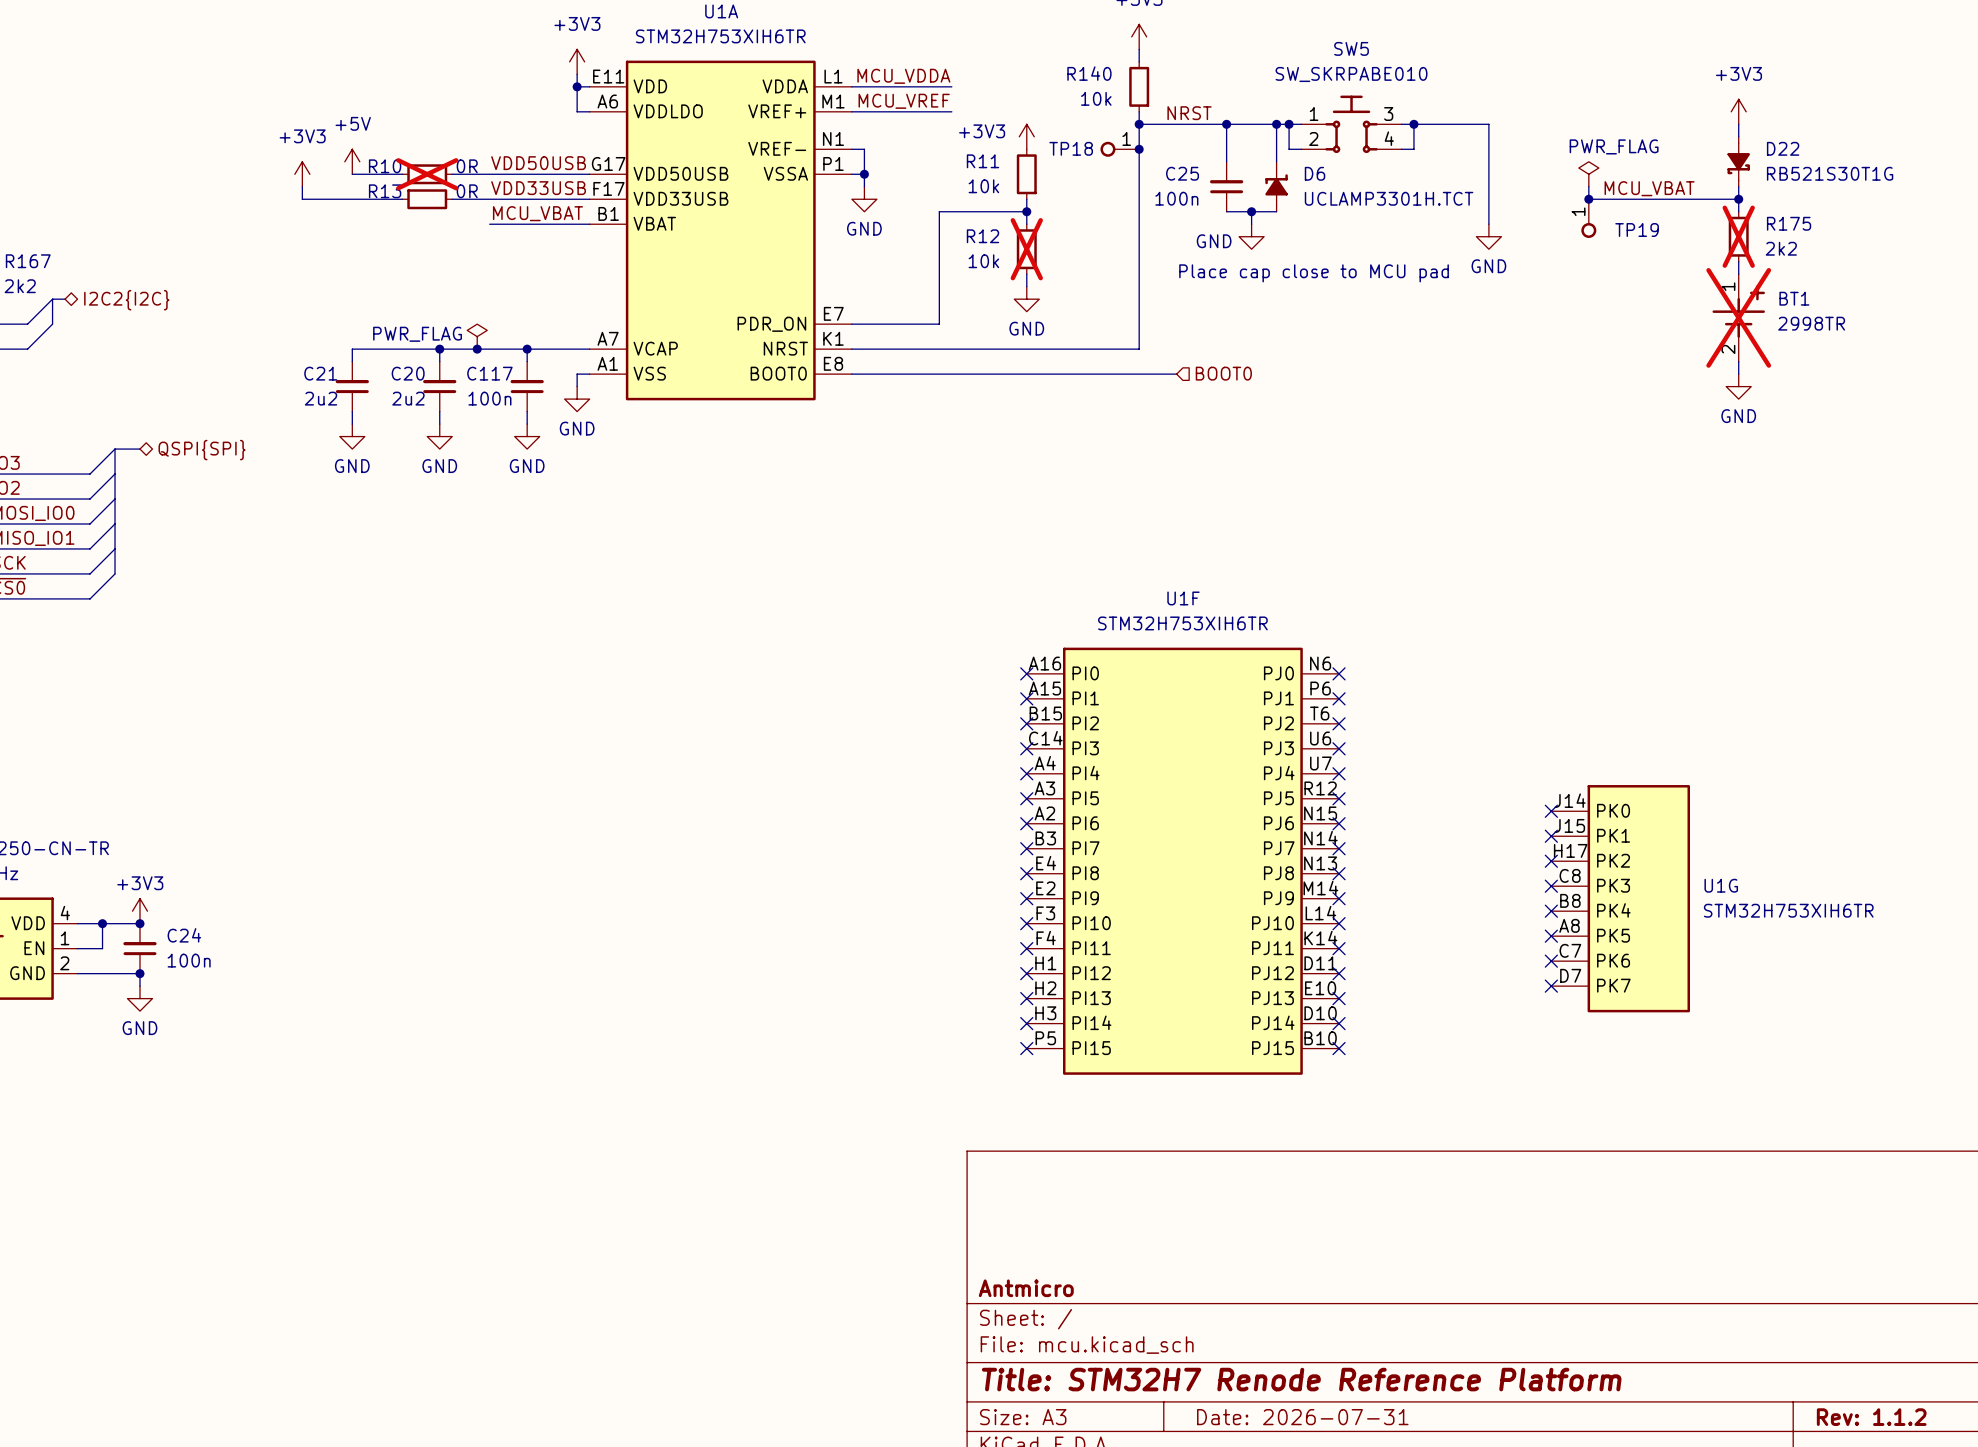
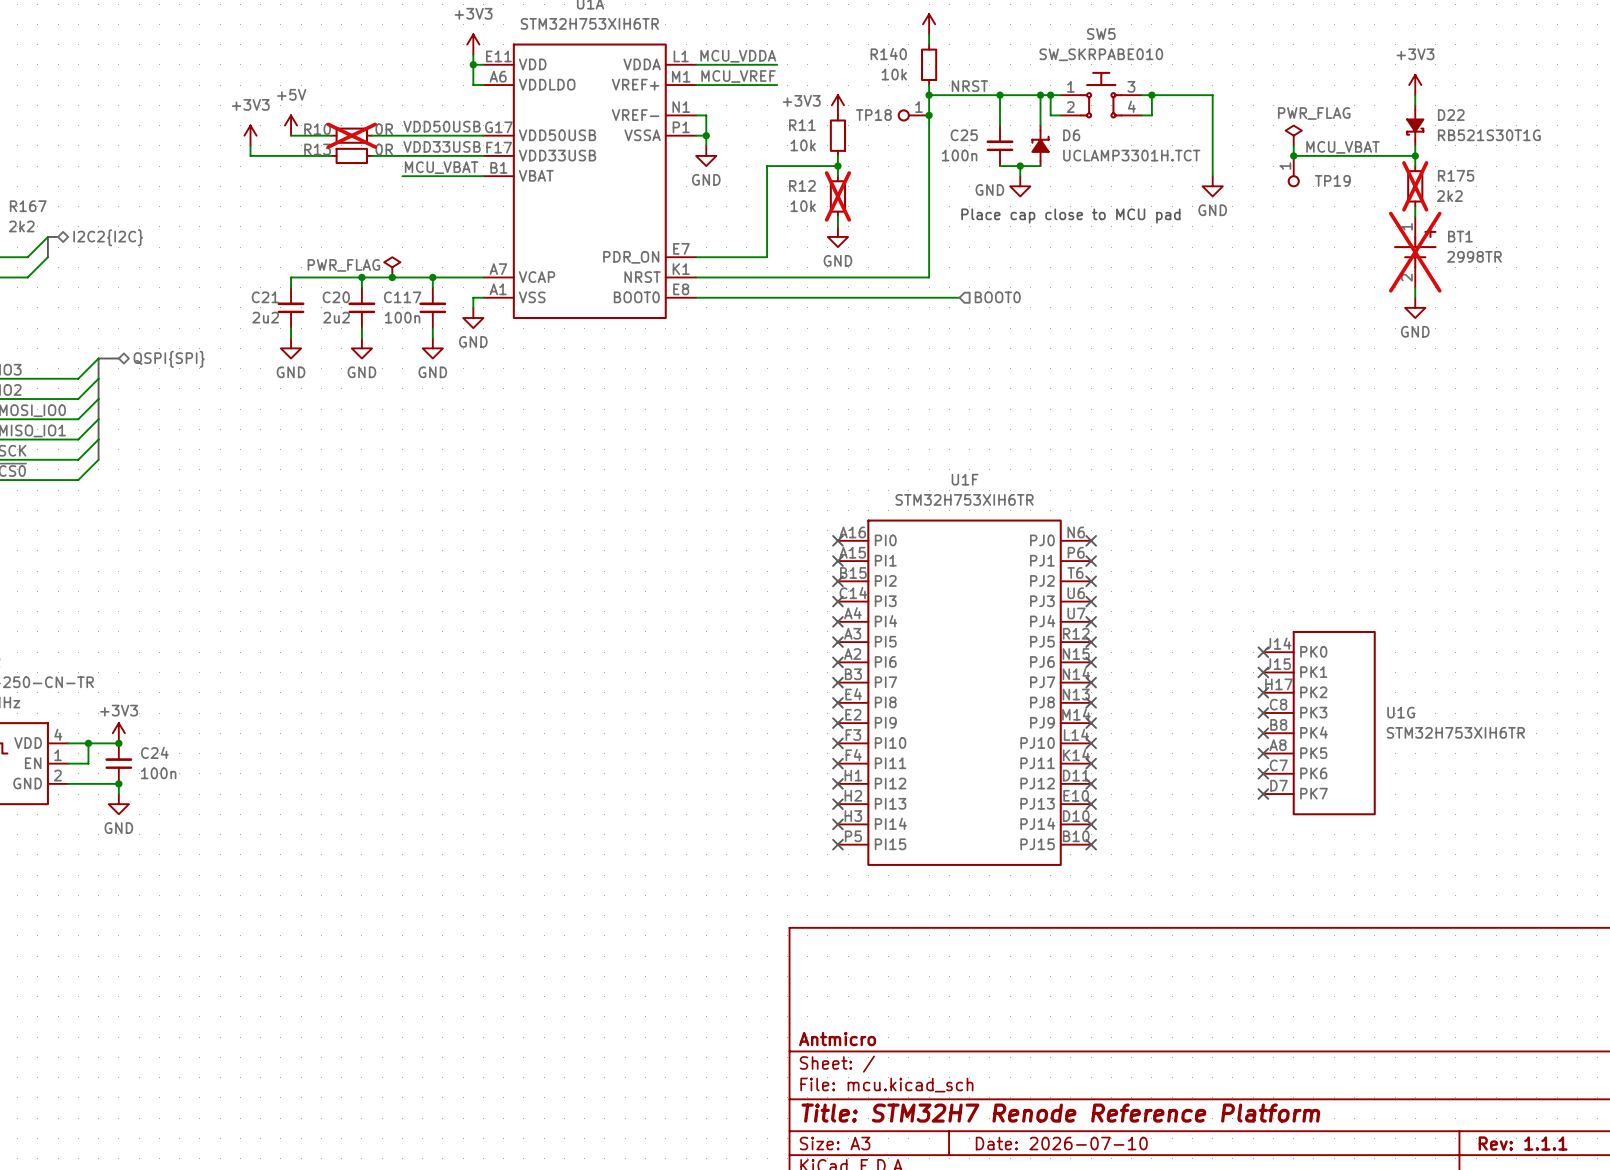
title block: Date: 2026-07-31 (1302, 1417) -> Date: 2026-07-10 (1061, 1143)
title block: Rev: 1.1.2 (1871, 1417) -> Rev: 1.1.1 (1523, 1143)

